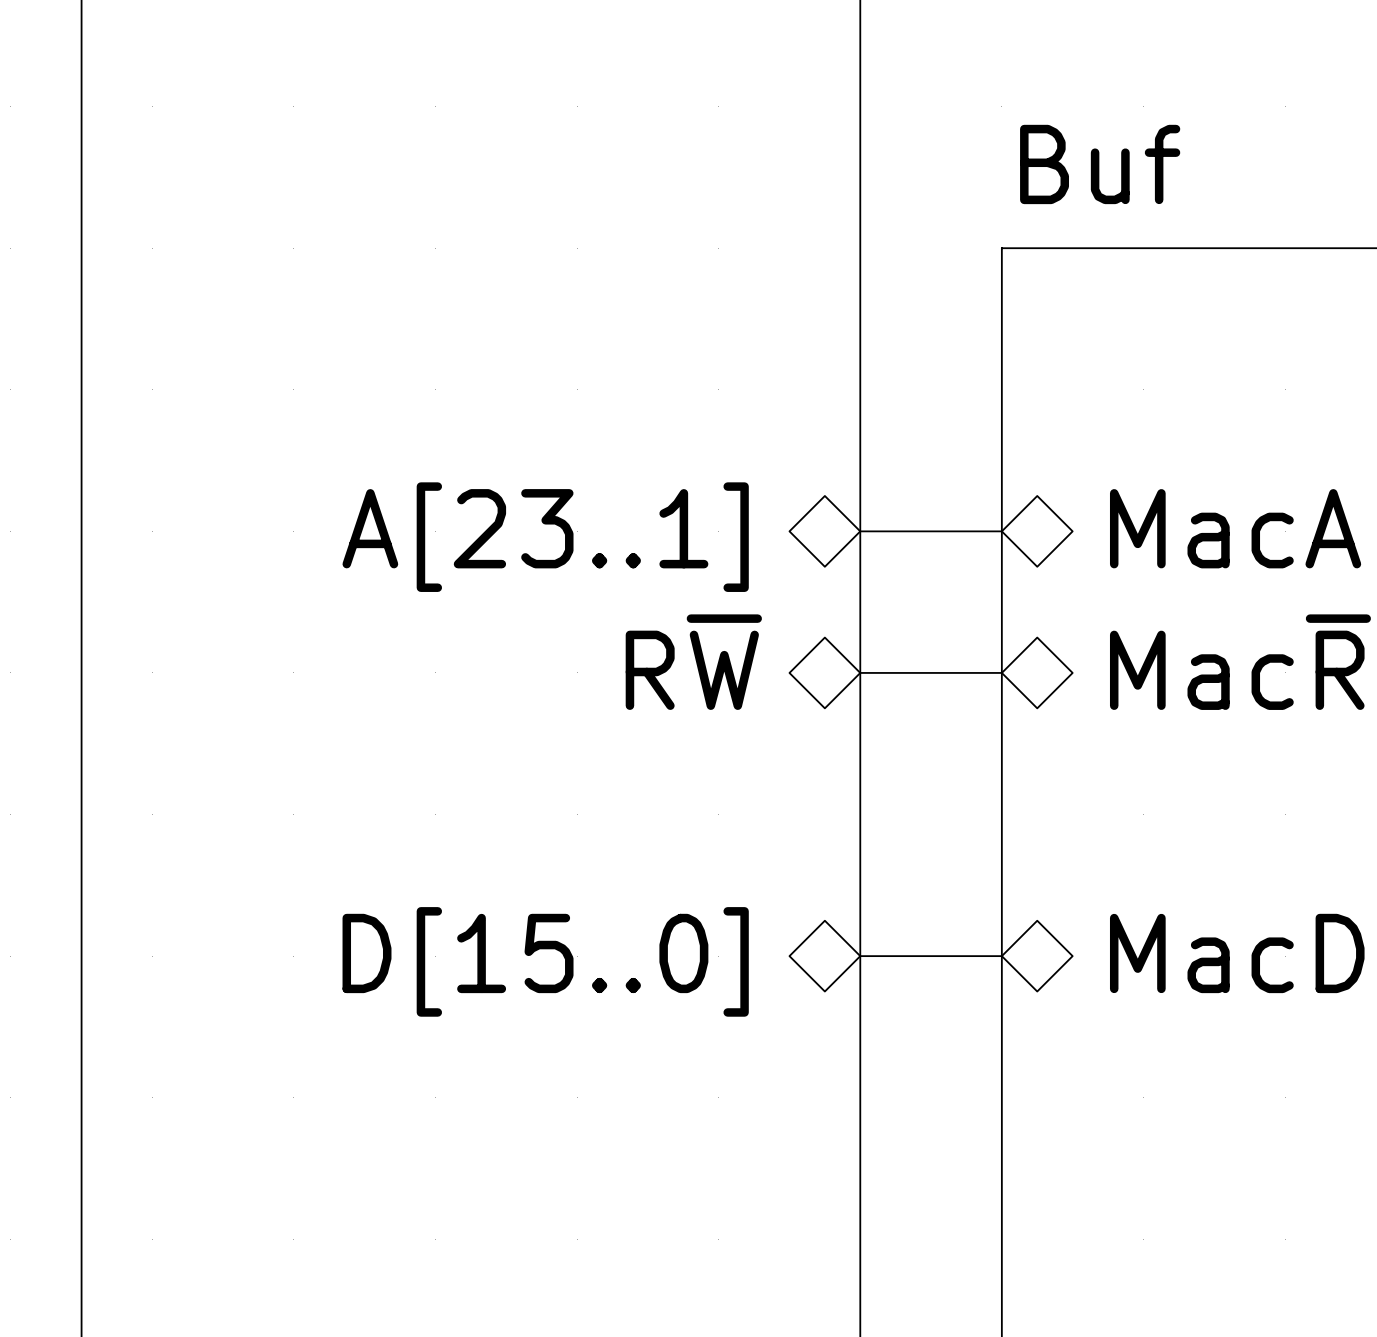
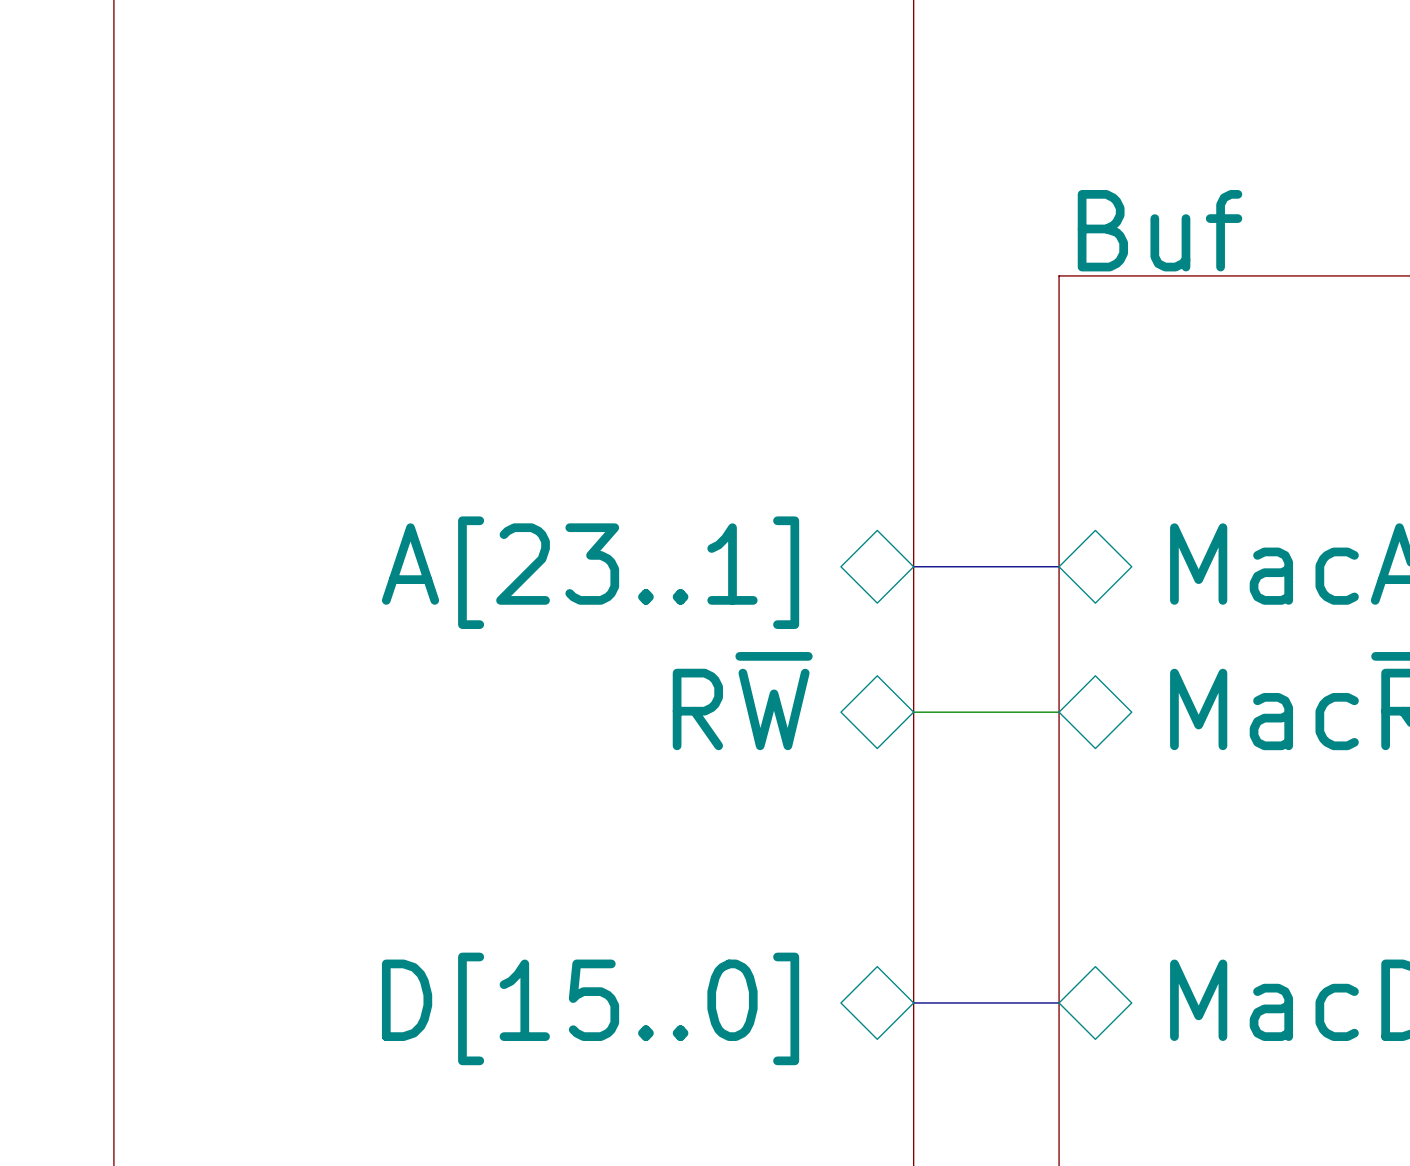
sheet Buf name position: Buf (1100, 164) -> Buf (1160, 230)

